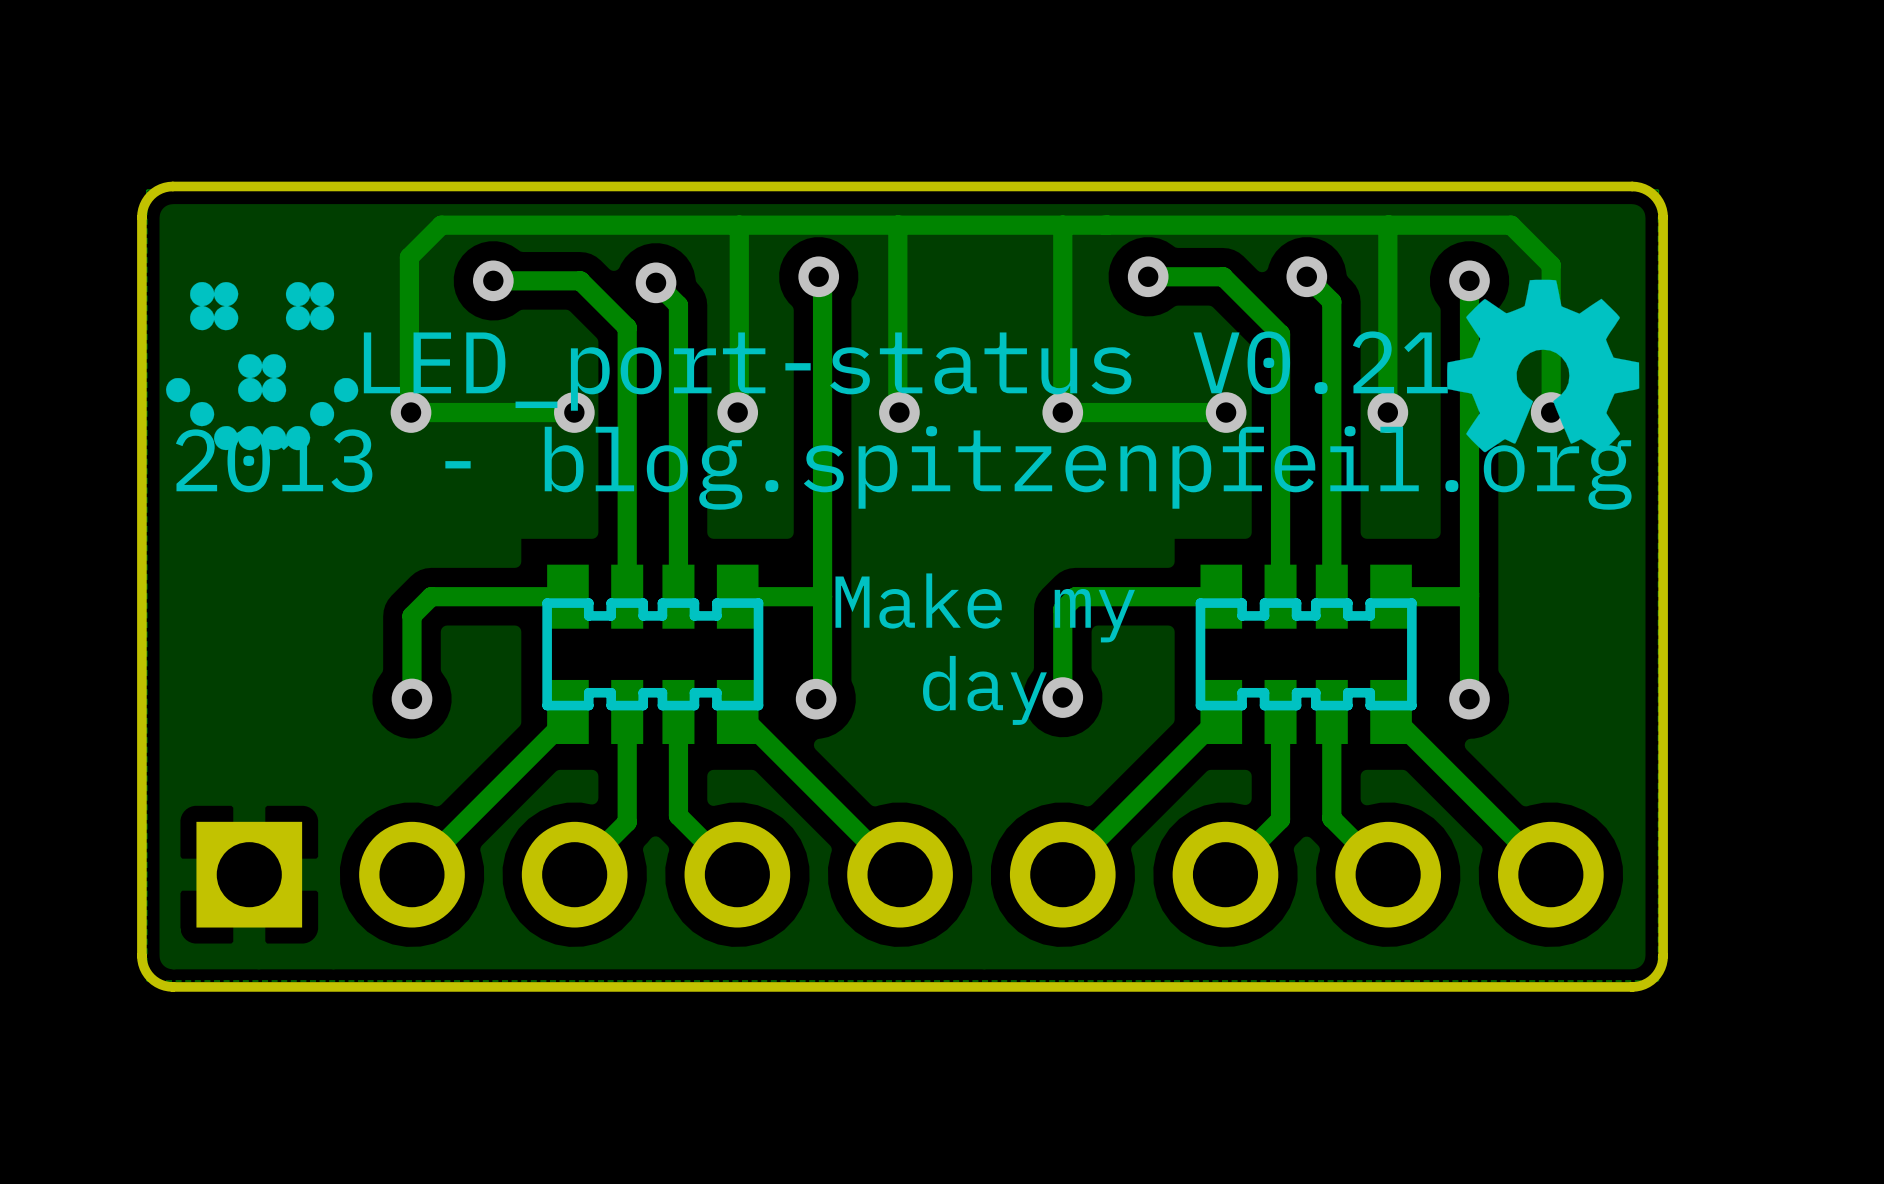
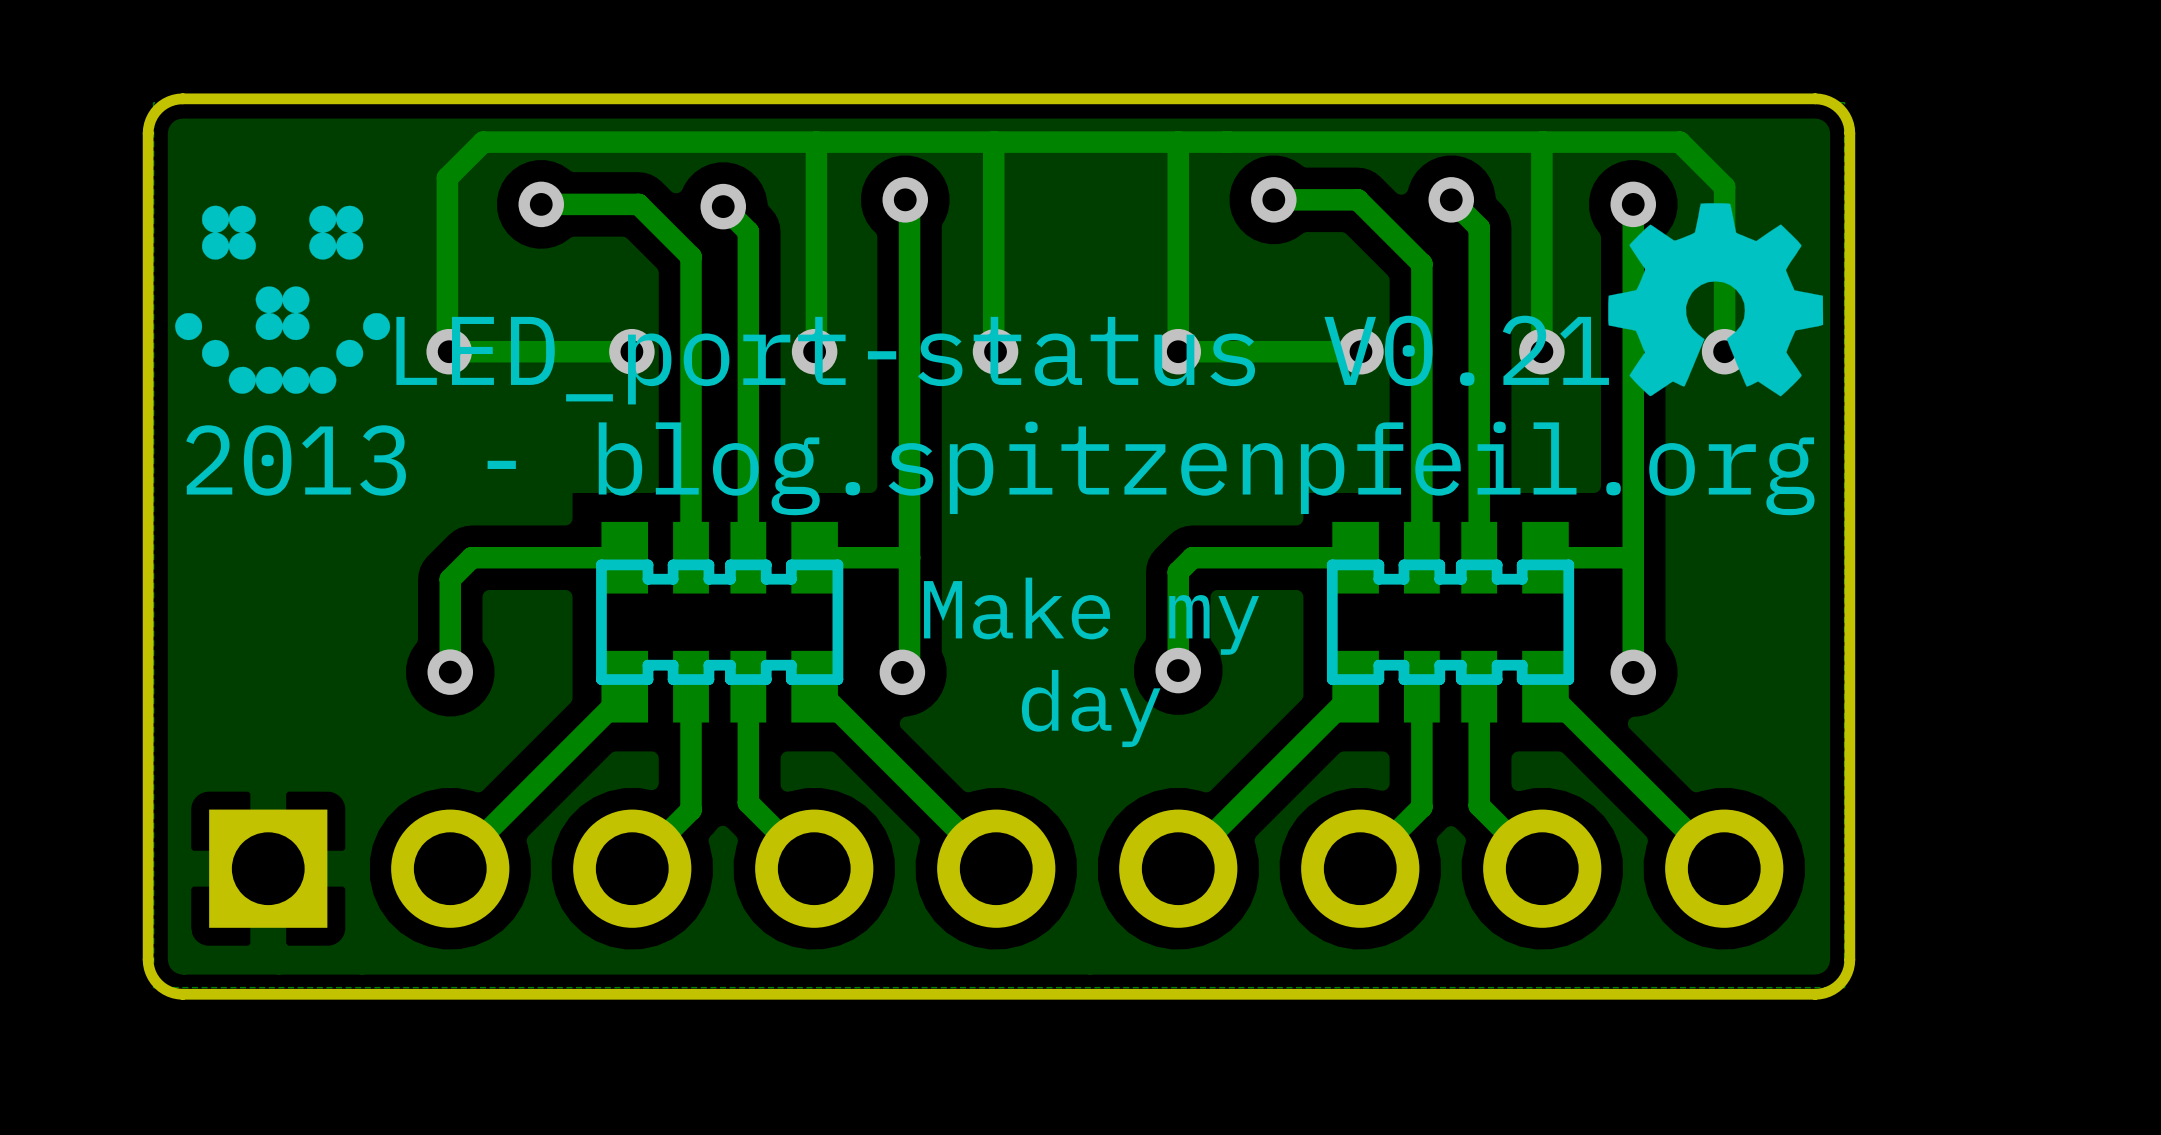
text position: LED_port-status V0.21 (905, 371) -> LED_port-status V0.21 (1002, 360)
text position: 2013 - blog.spitzenpfeil.org (903, 467) -> 2013 - blog.spitzenpfeil.org (1000, 468)
text position: Make my (985, 607) -> Make my (1091, 616)
text position: day (984, 690) -> day (1091, 708)

